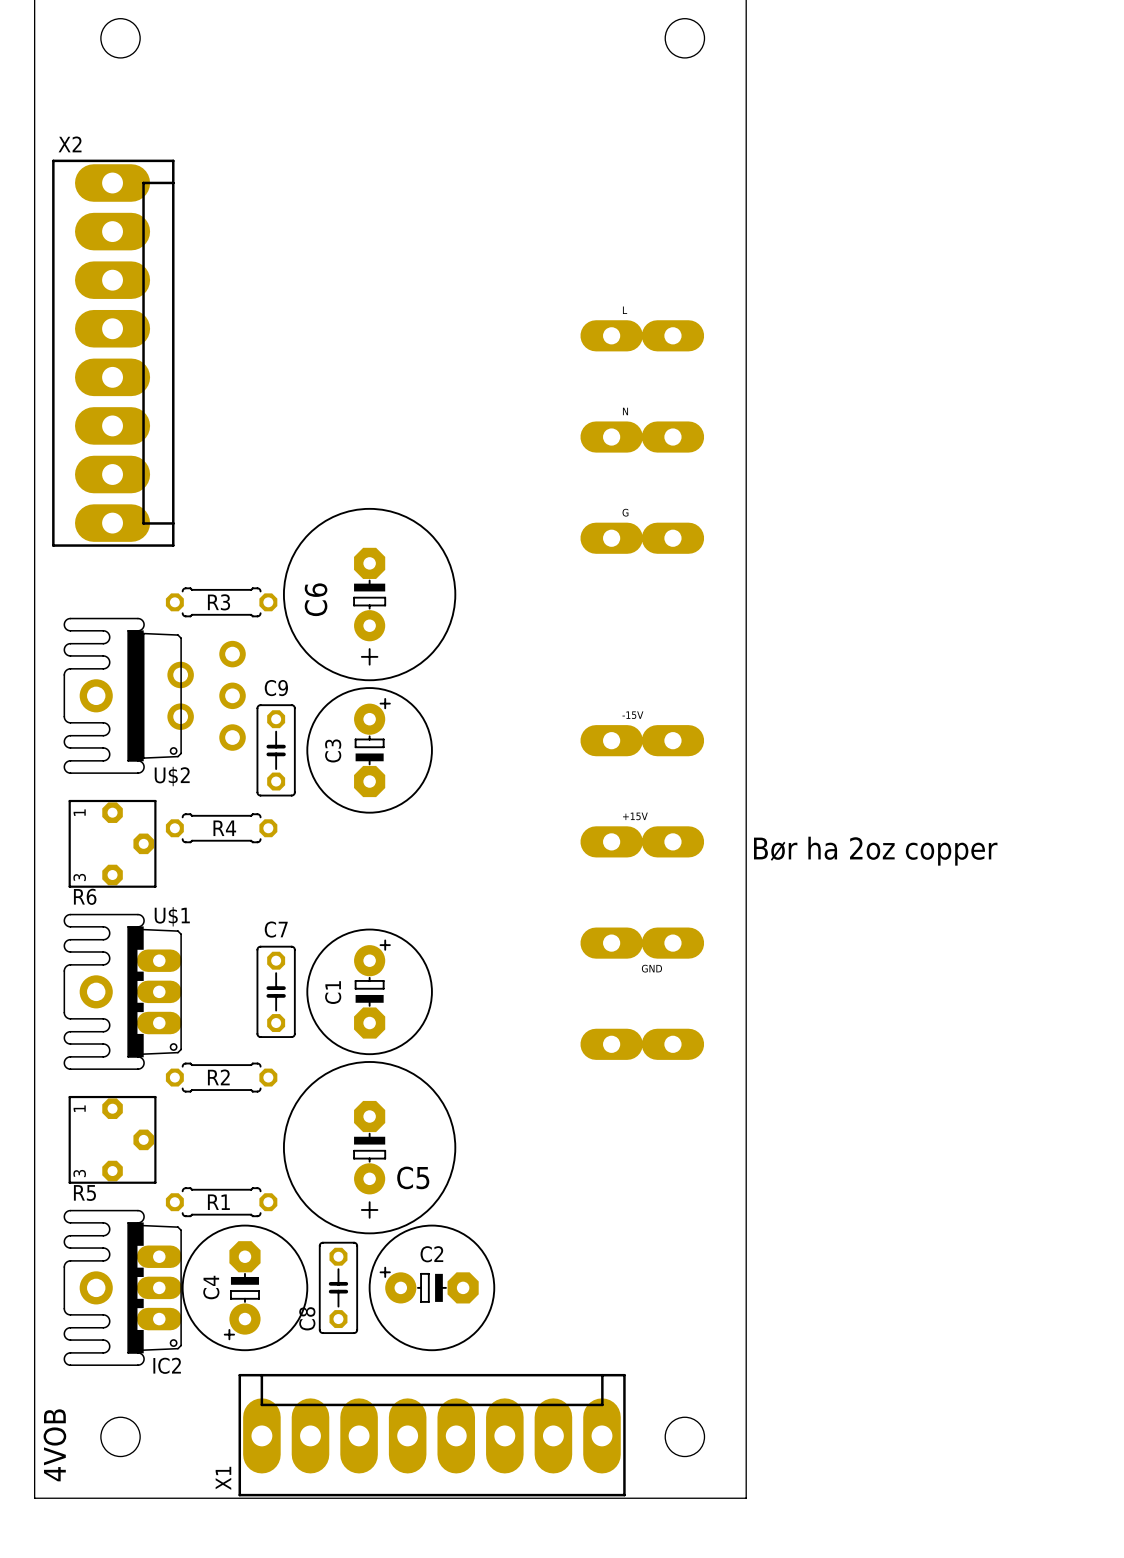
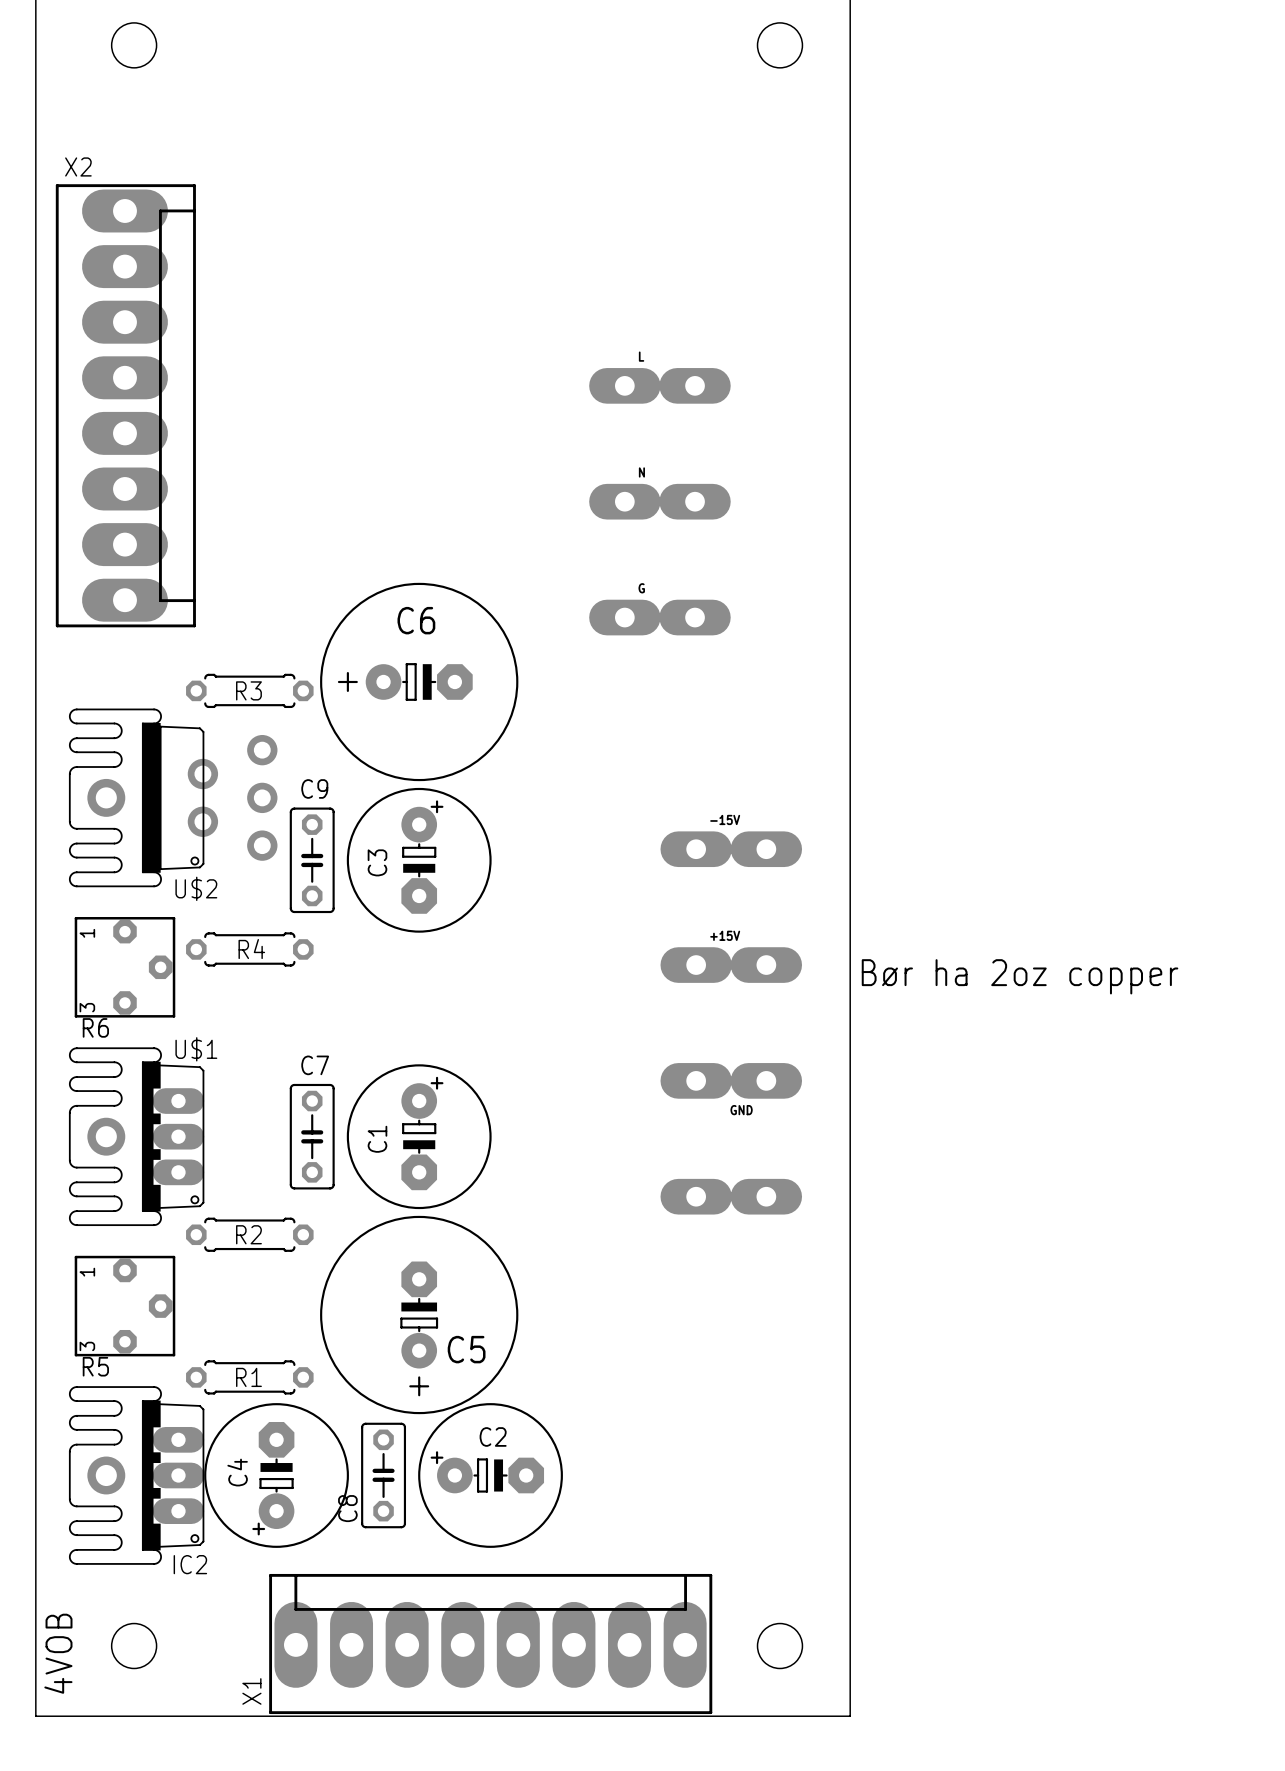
L position: (642, 335) -> (659, 385)
N position: (642, 437) -> (659, 501)
G position: (642, 538) -> (659, 617)
C6 rotation: 0° (369, 594) -> 90° clockwise (419, 681)

